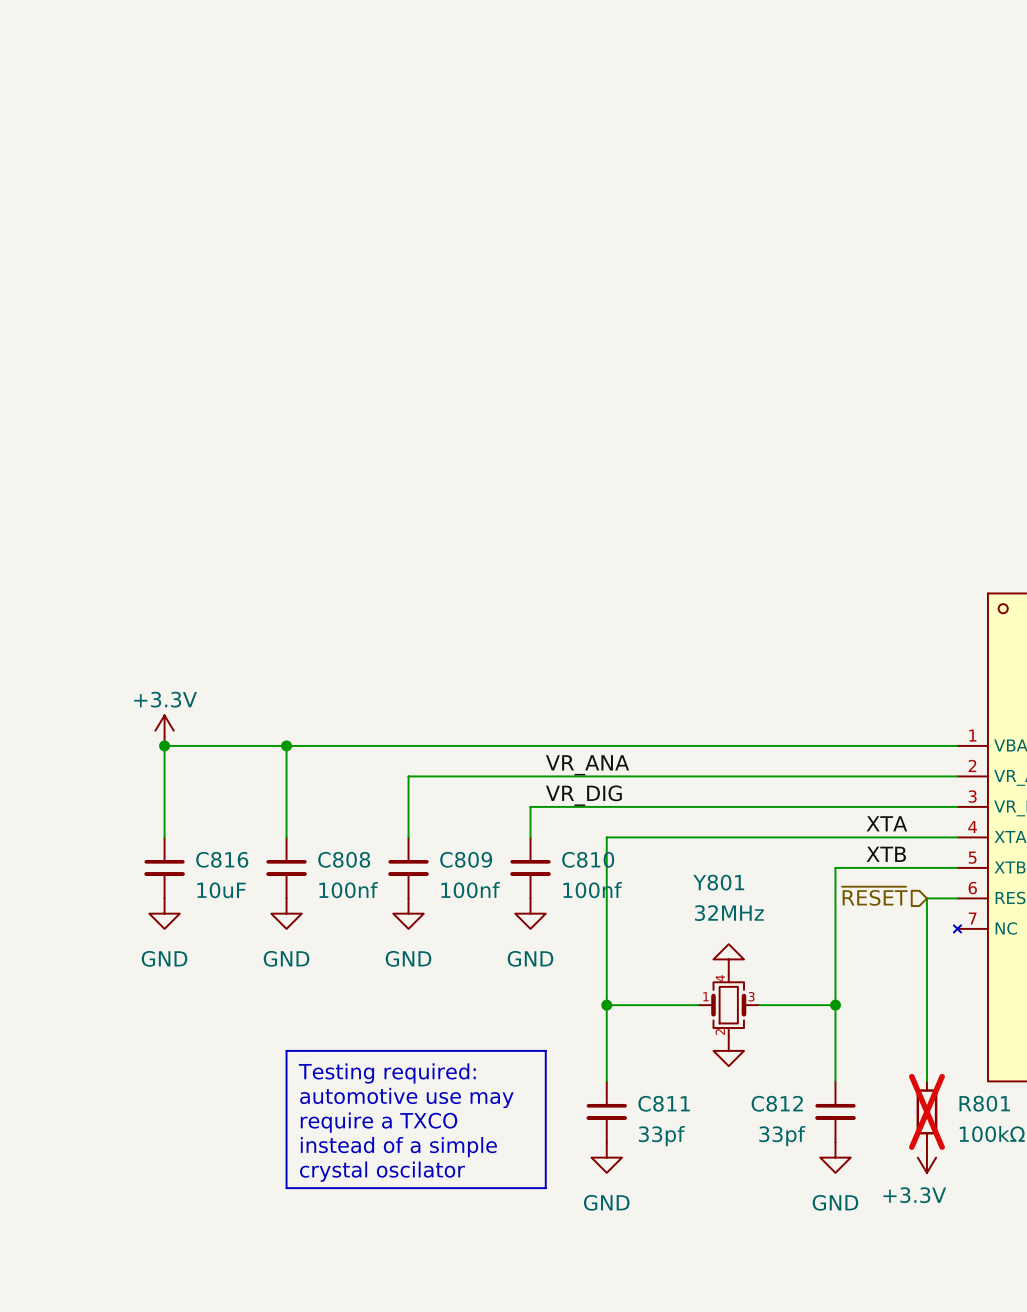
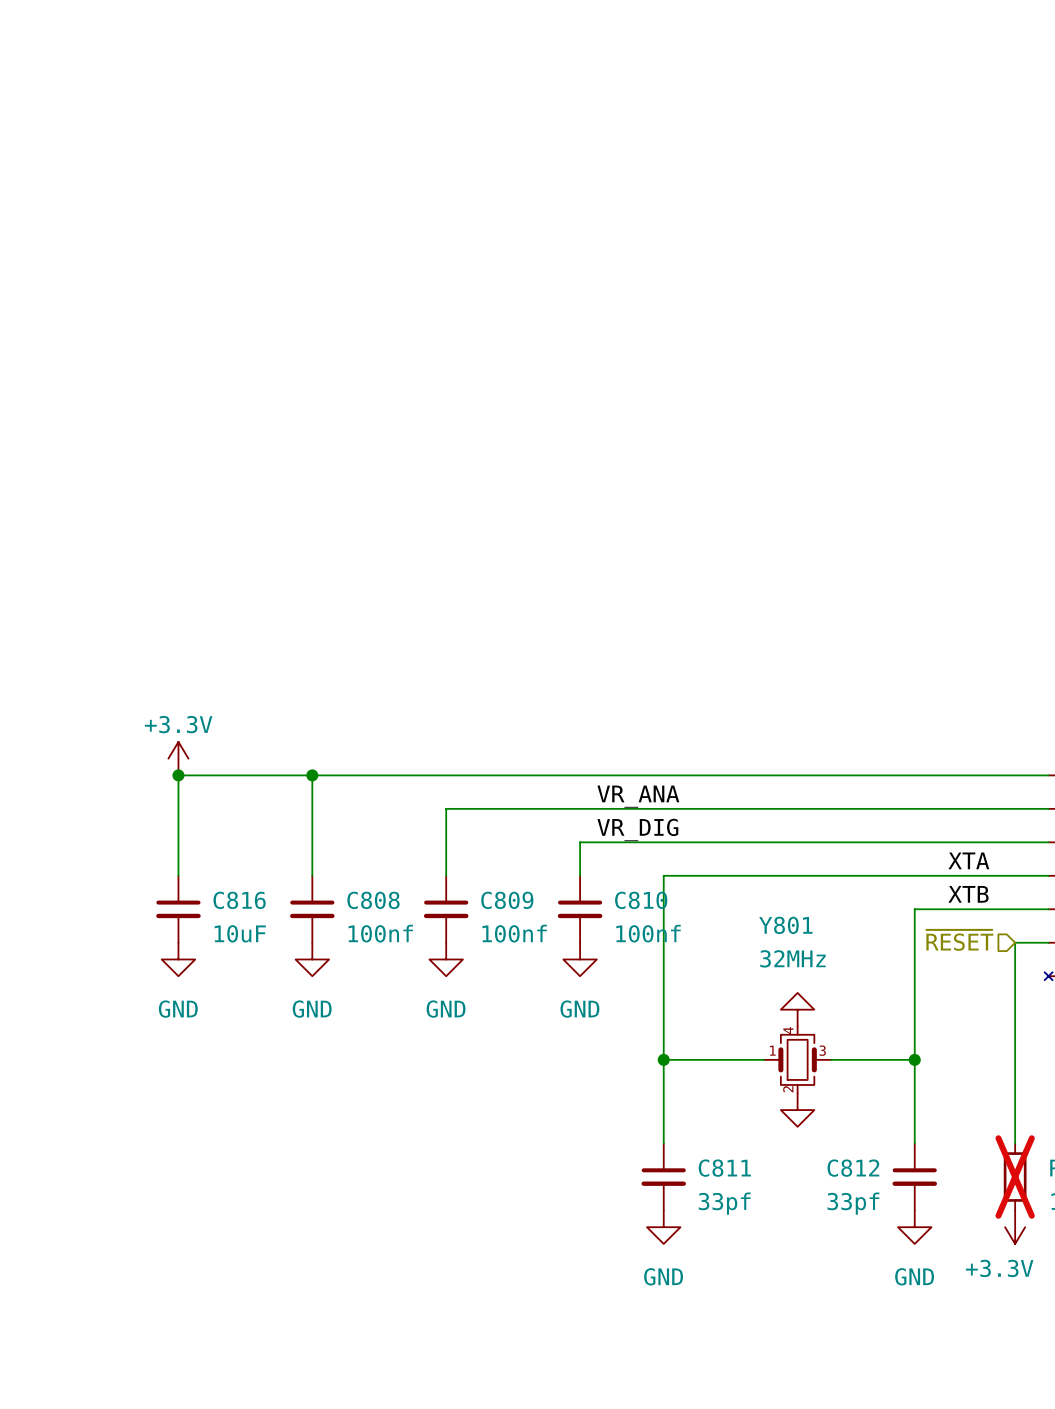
line: (286, 1050) (545, 1050) (545, 1188) (286, 1188) (286, 1050) -> none
text: Testing required: (387, 1073) -> none
text: automotive use may (406, 1098) -> none
text: require a TXCO (379, 1122) -> none
text: instead of a simple (398, 1147) -> none
text: crystal oscilator (382, 1171) -> none

